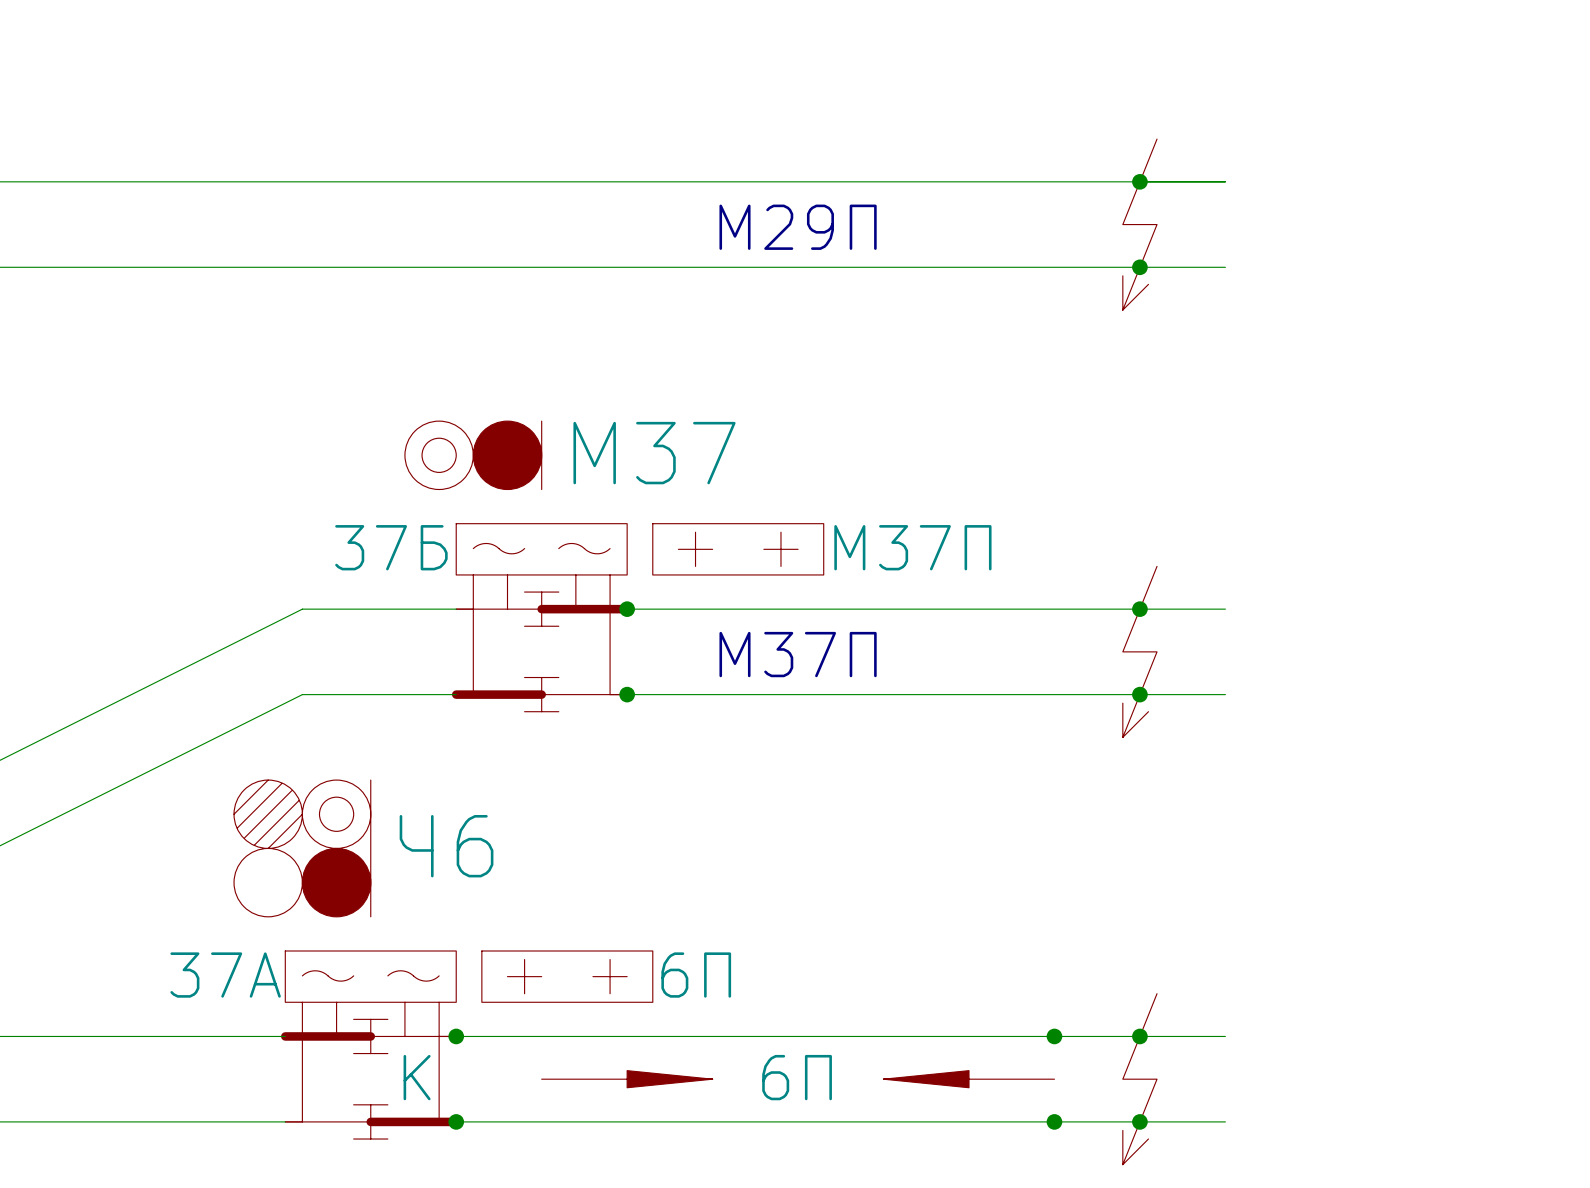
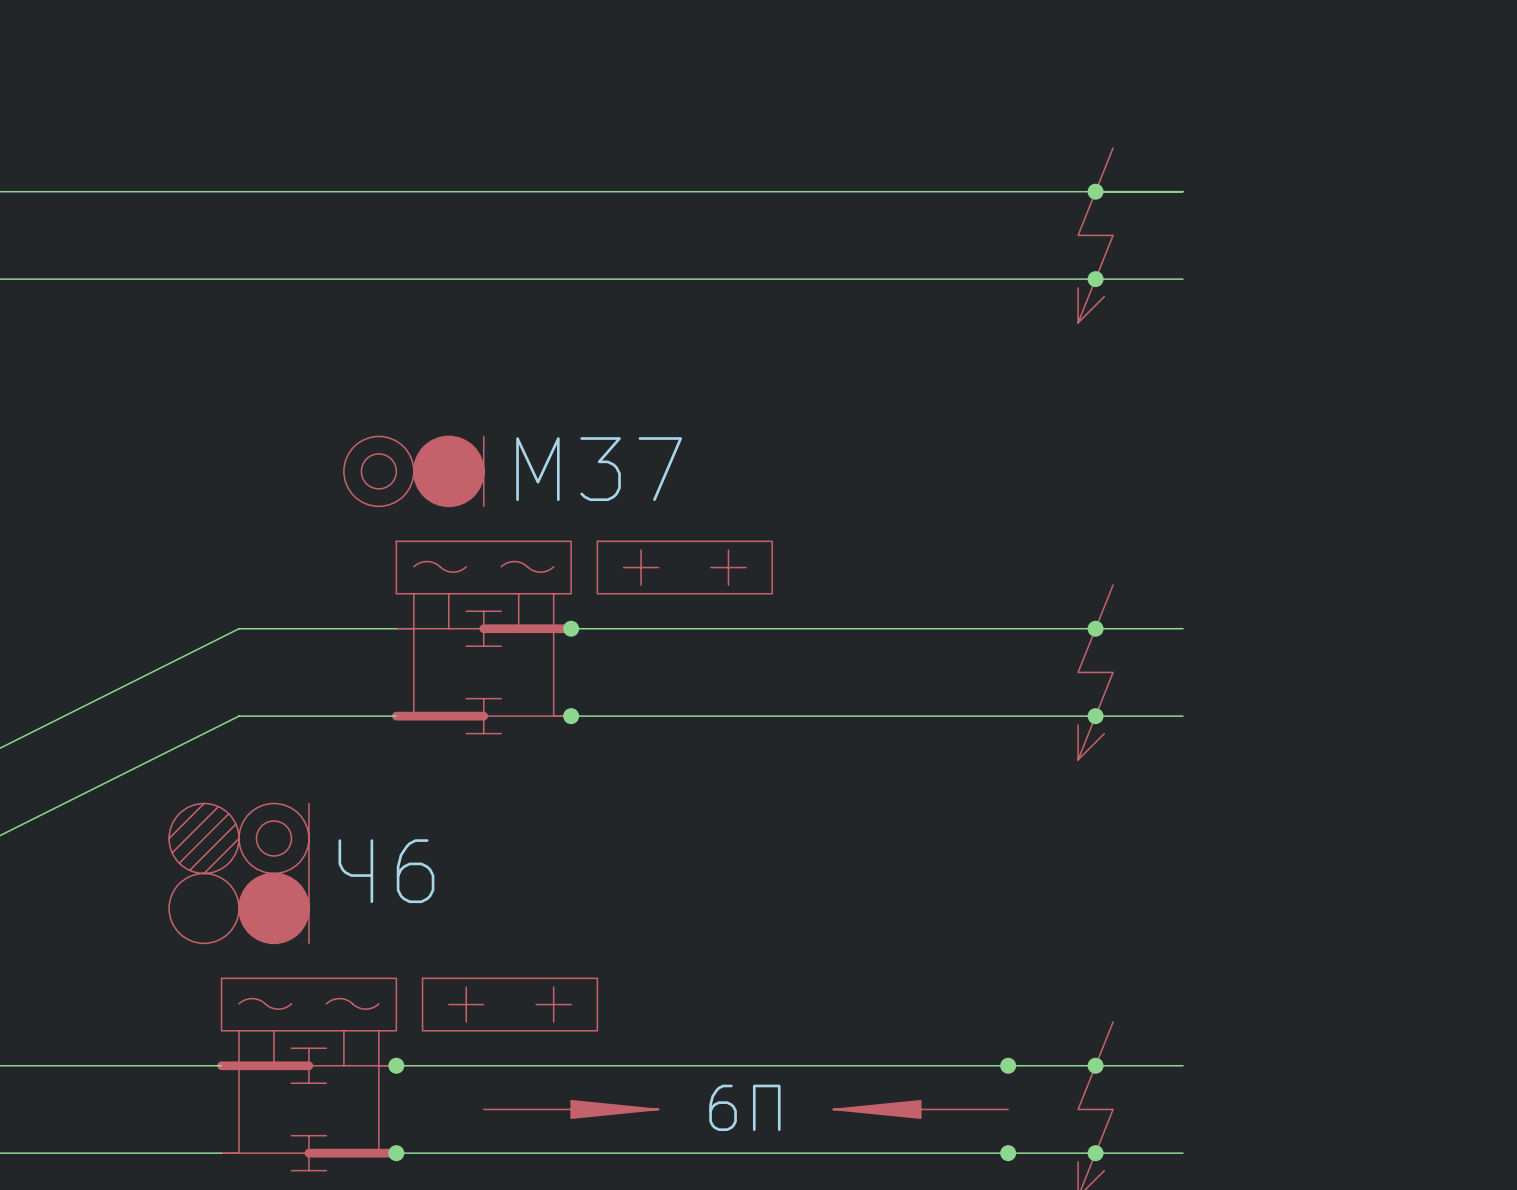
text: М29П (798, 227) -> none
part text: 37Б (391, 547) -> none
part text: М37П (912, 547) -> none
text: М37П (798, 654) -> none
part text: 37А (225, 975) -> none
part text: 6П (696, 975) -> none
part text: К (417, 1077) -> none

